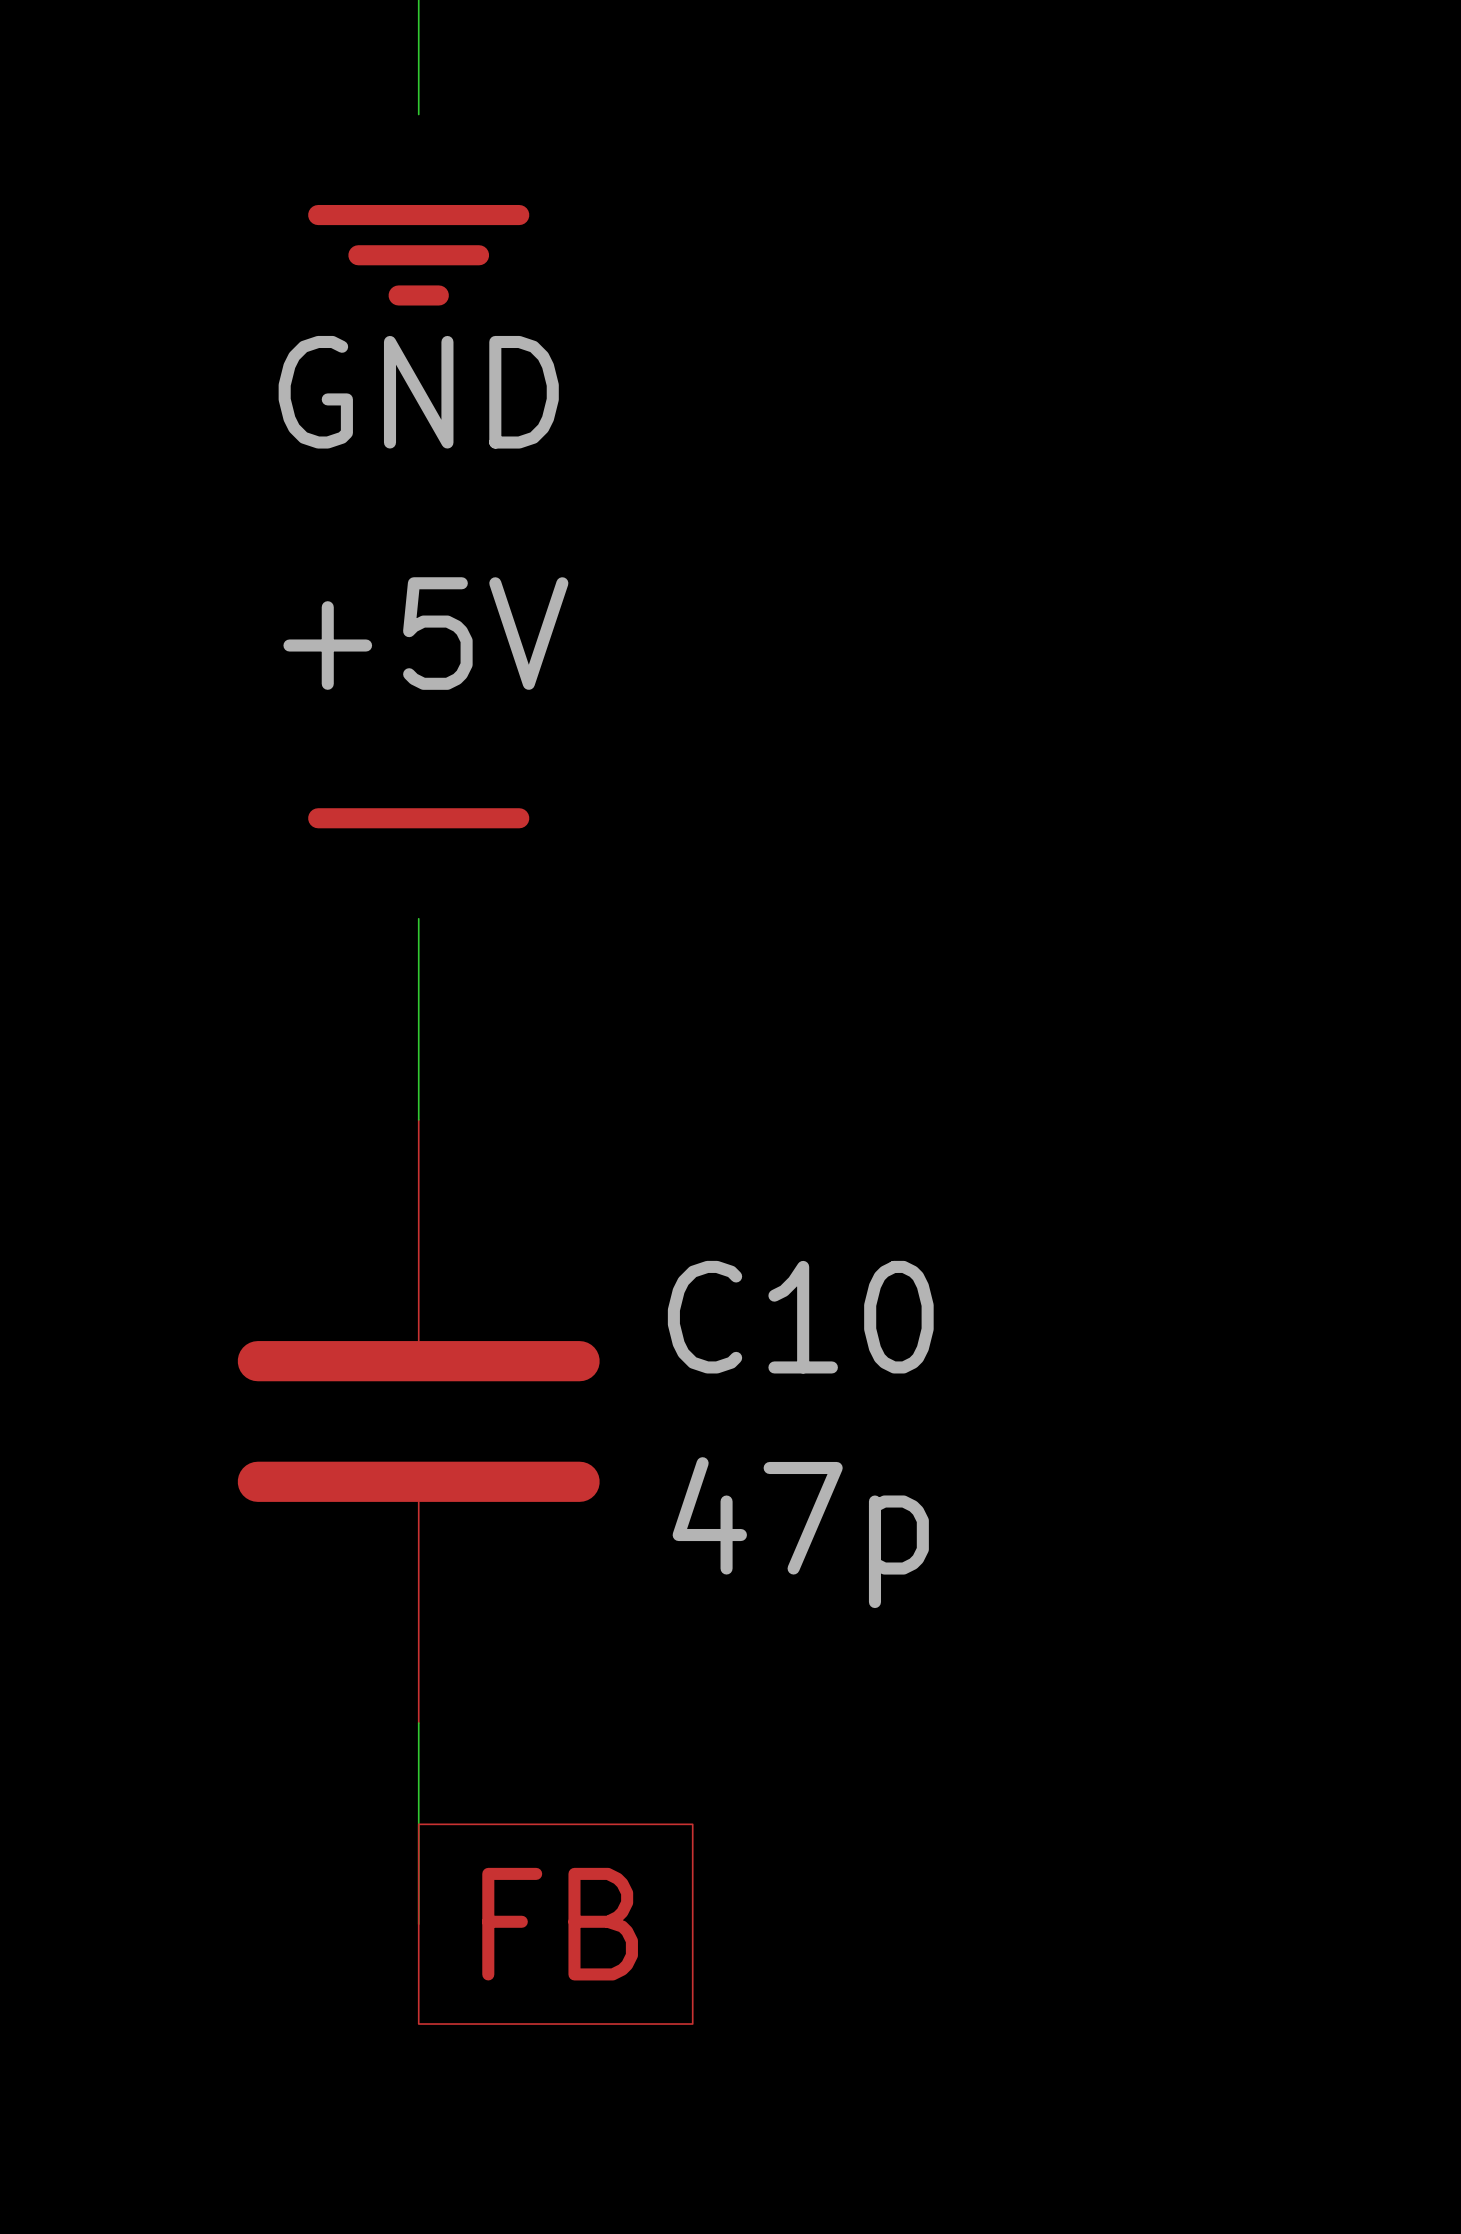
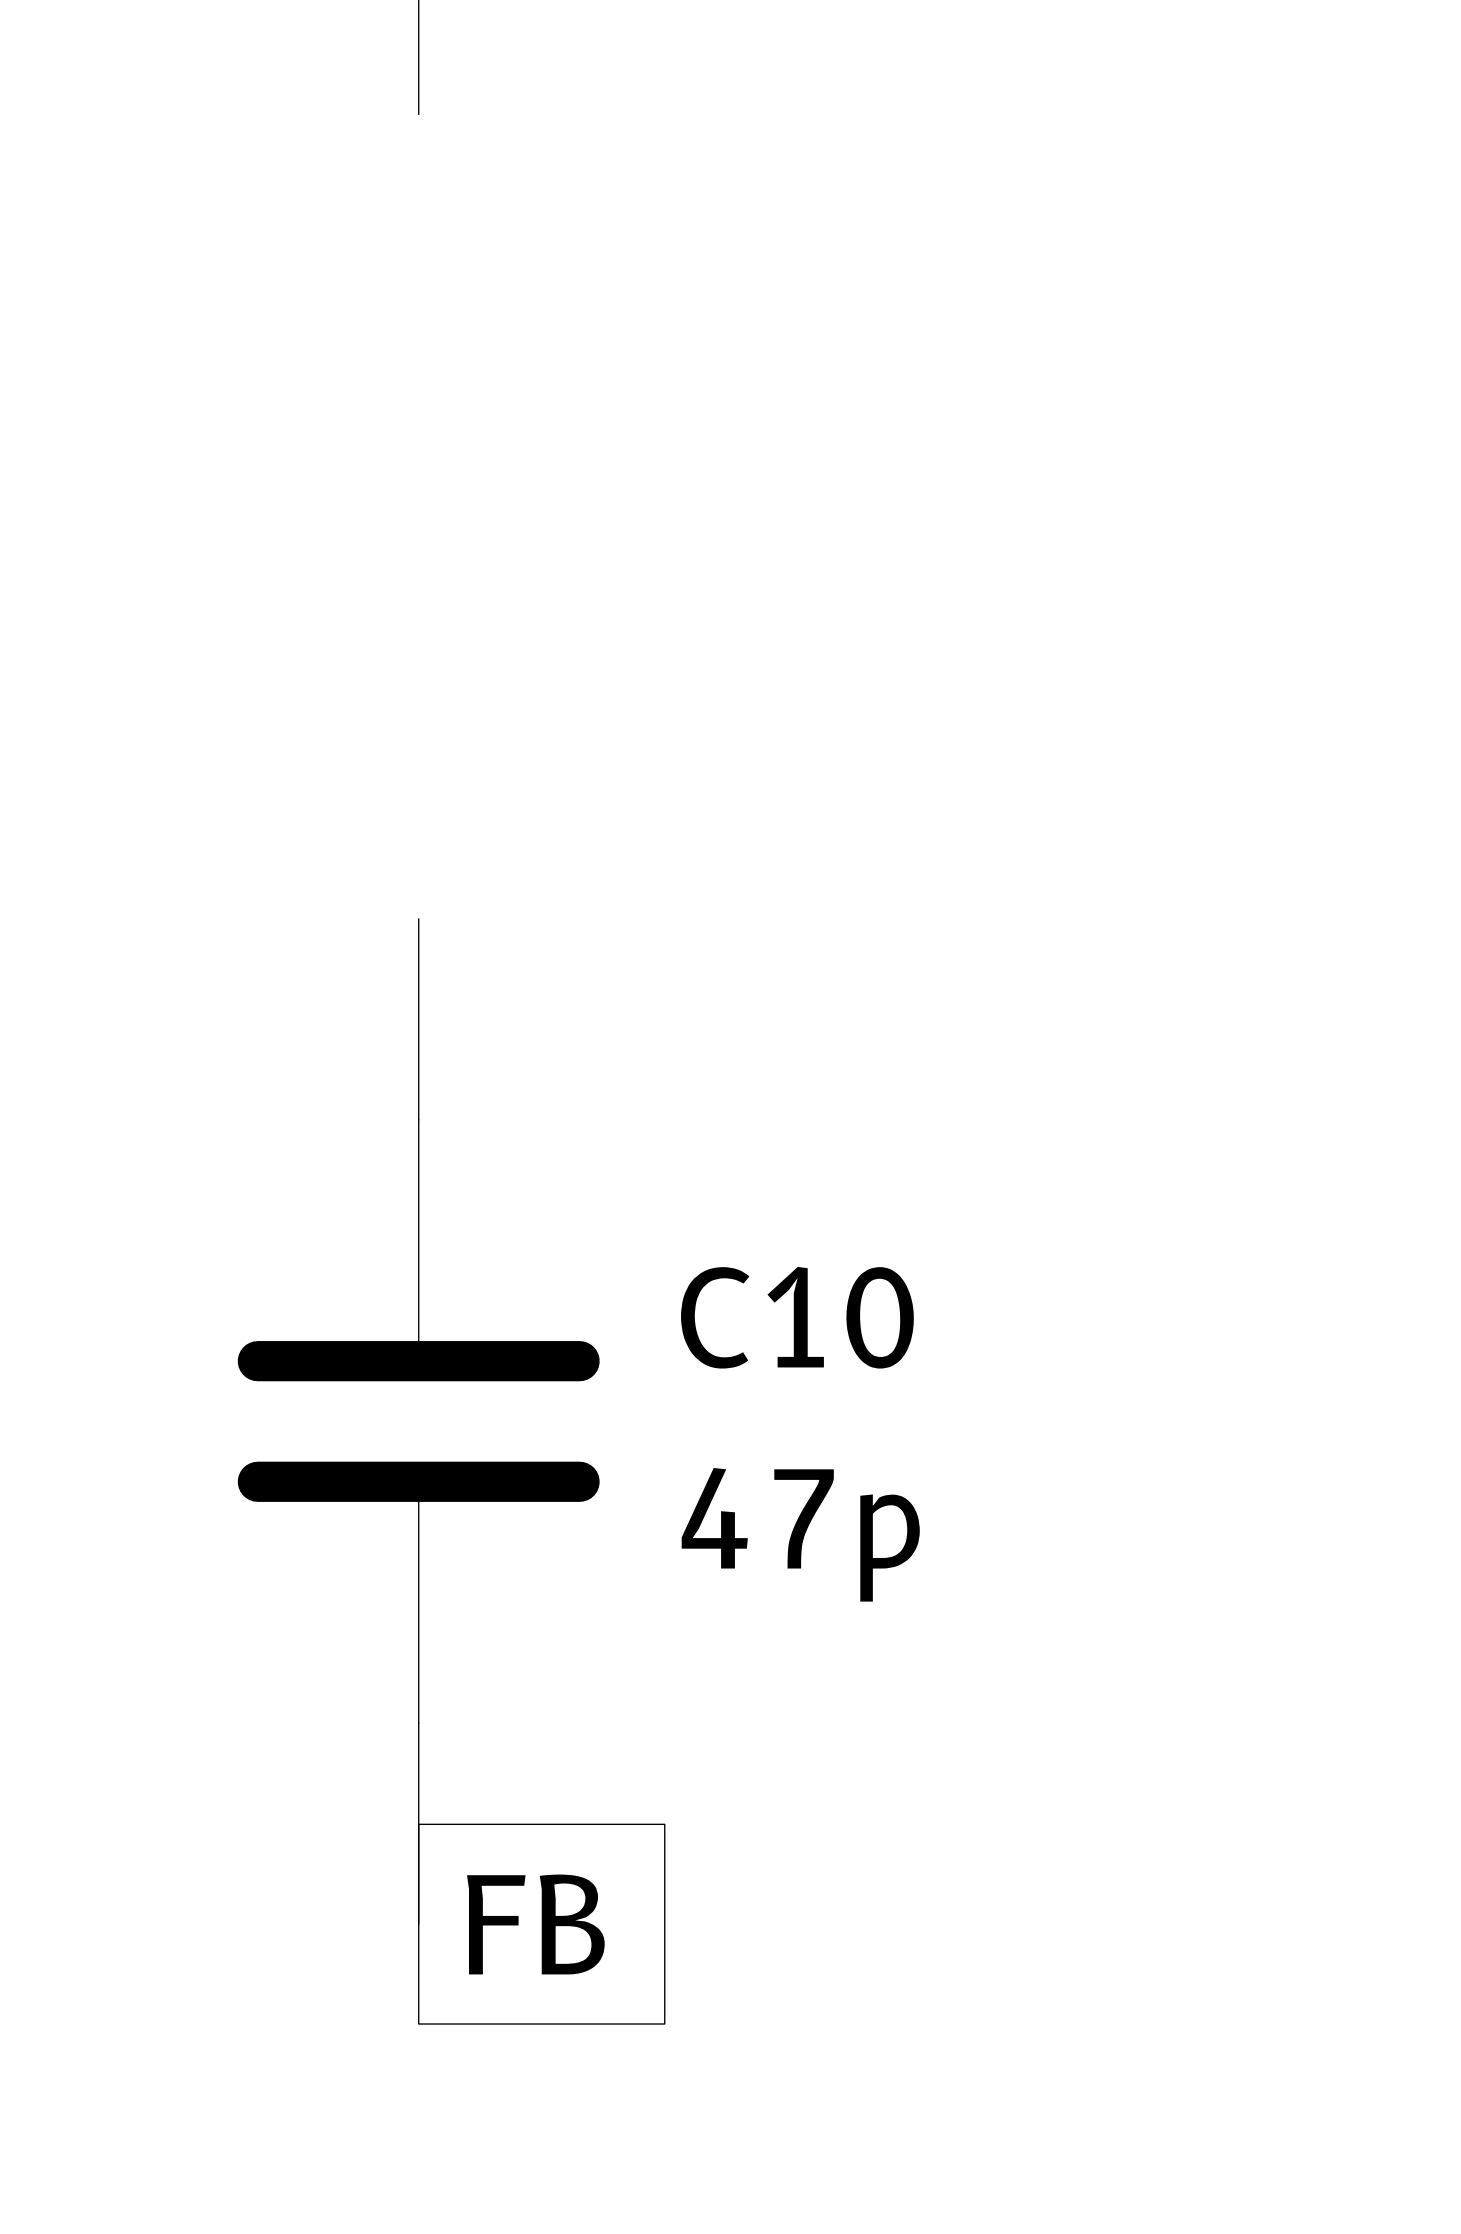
power symbol: GND (418, 255) -> none
power symbol: +5V (418, 818) -> none

